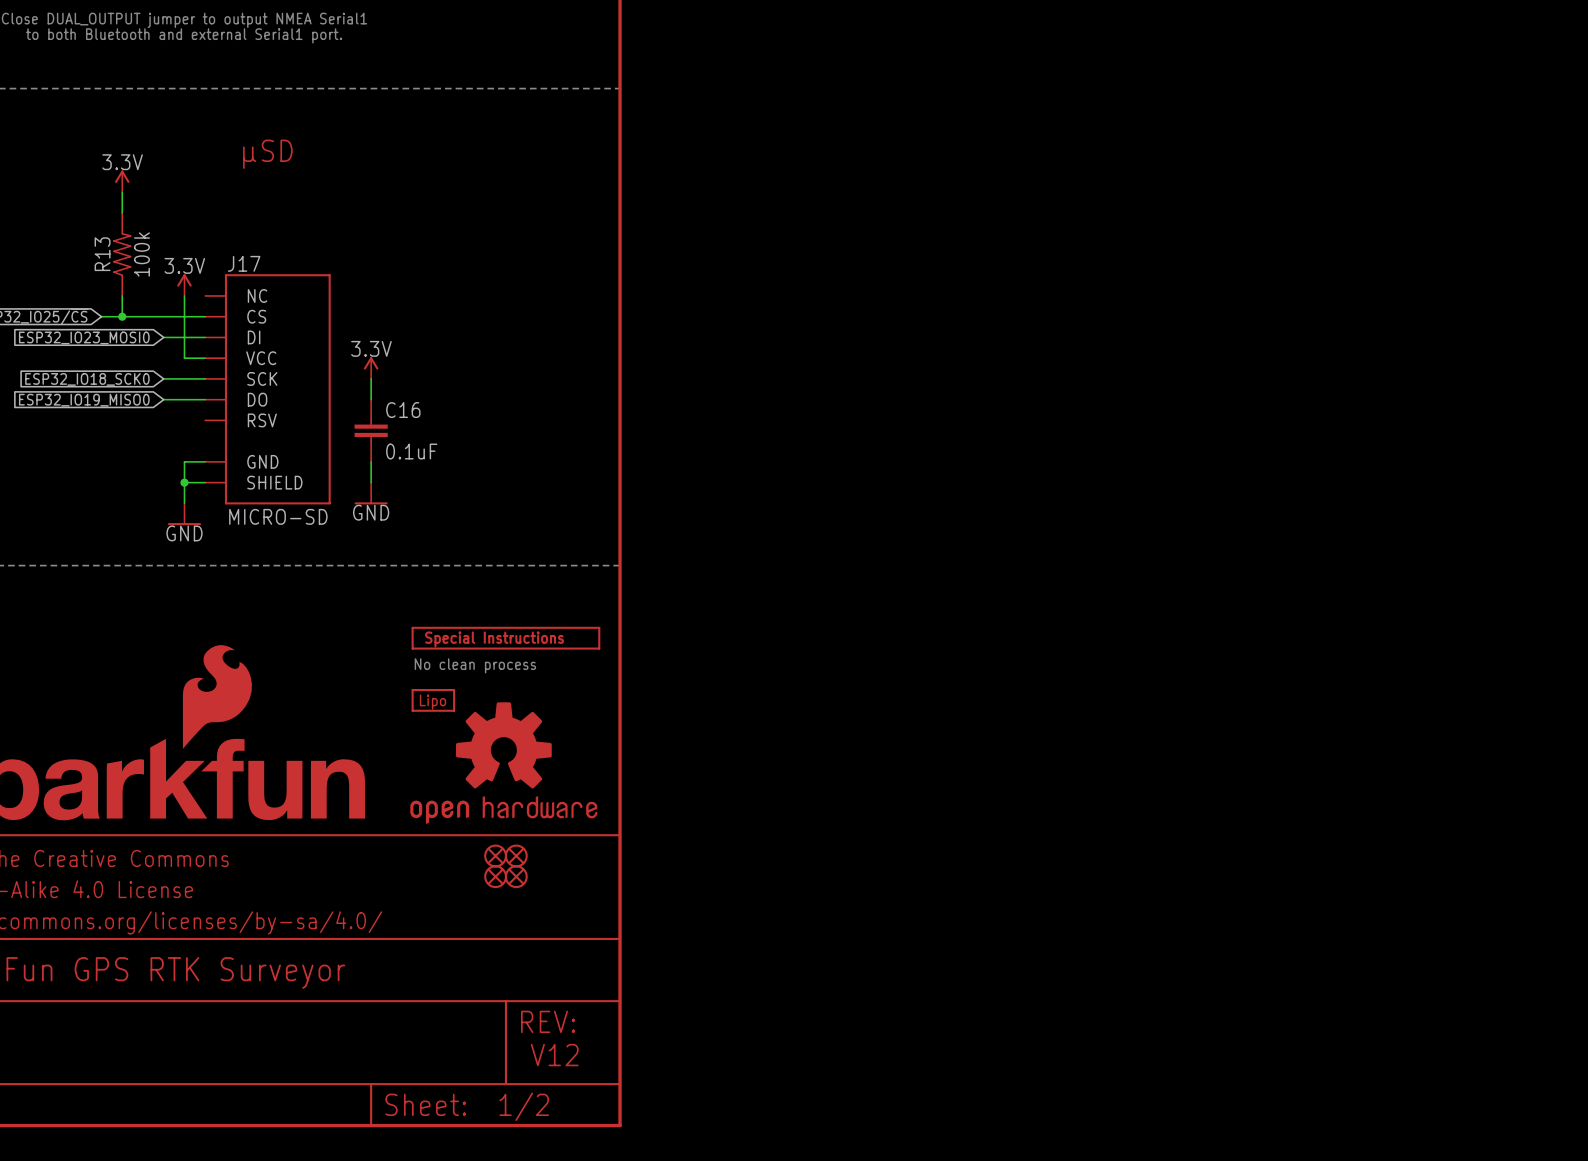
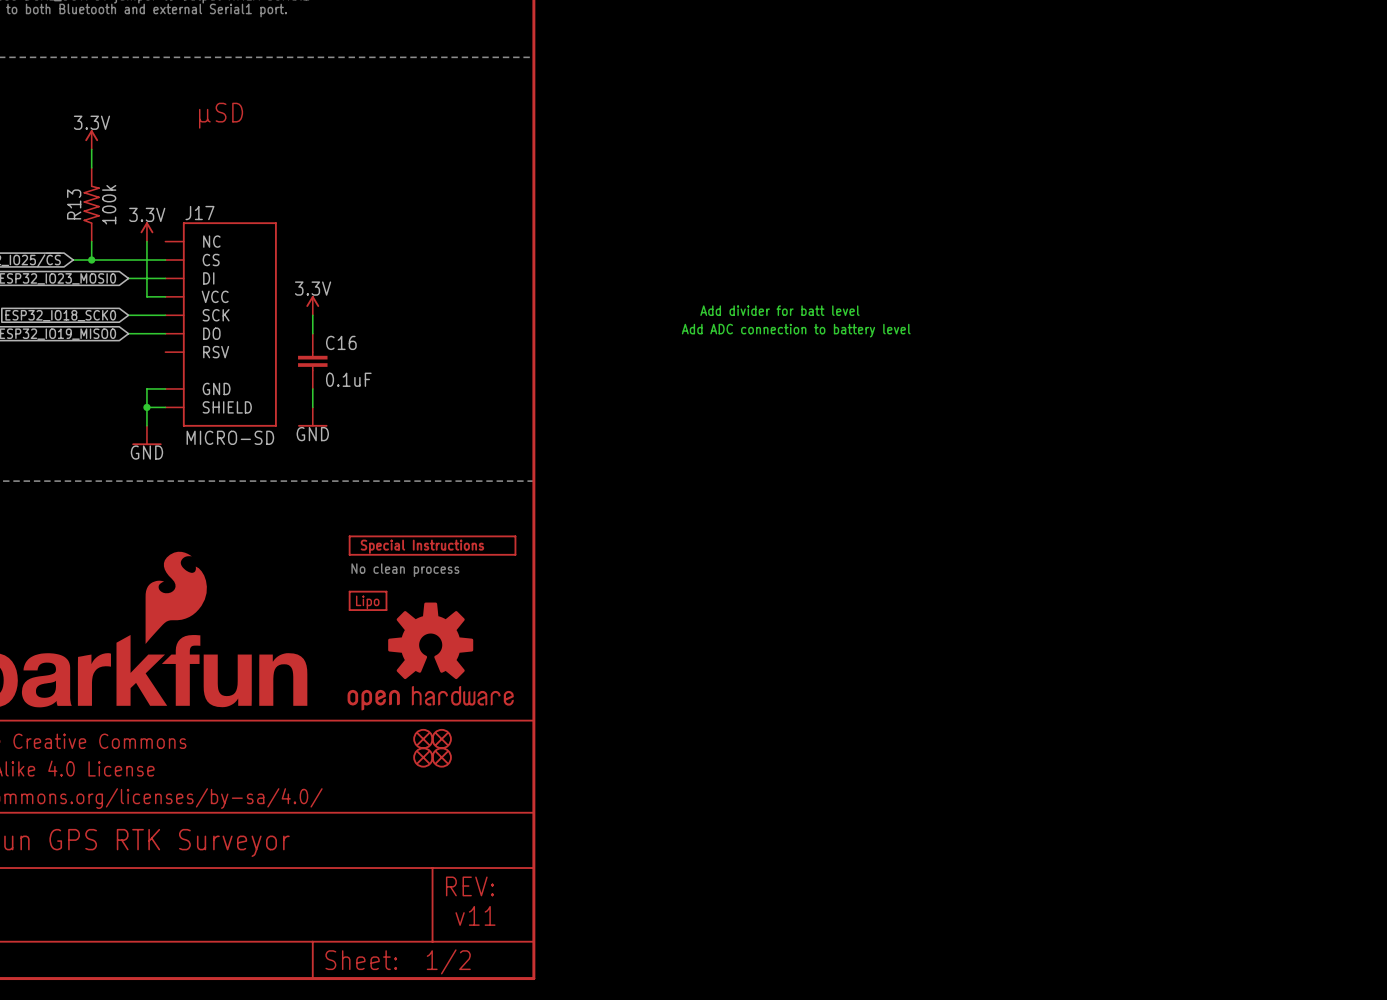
text: none -> Add divider for batt level (779, 310)
text: none -> Add ADC connection to battery level (796, 330)
text: V12 (554, 1055) -> v11 (475, 915)

